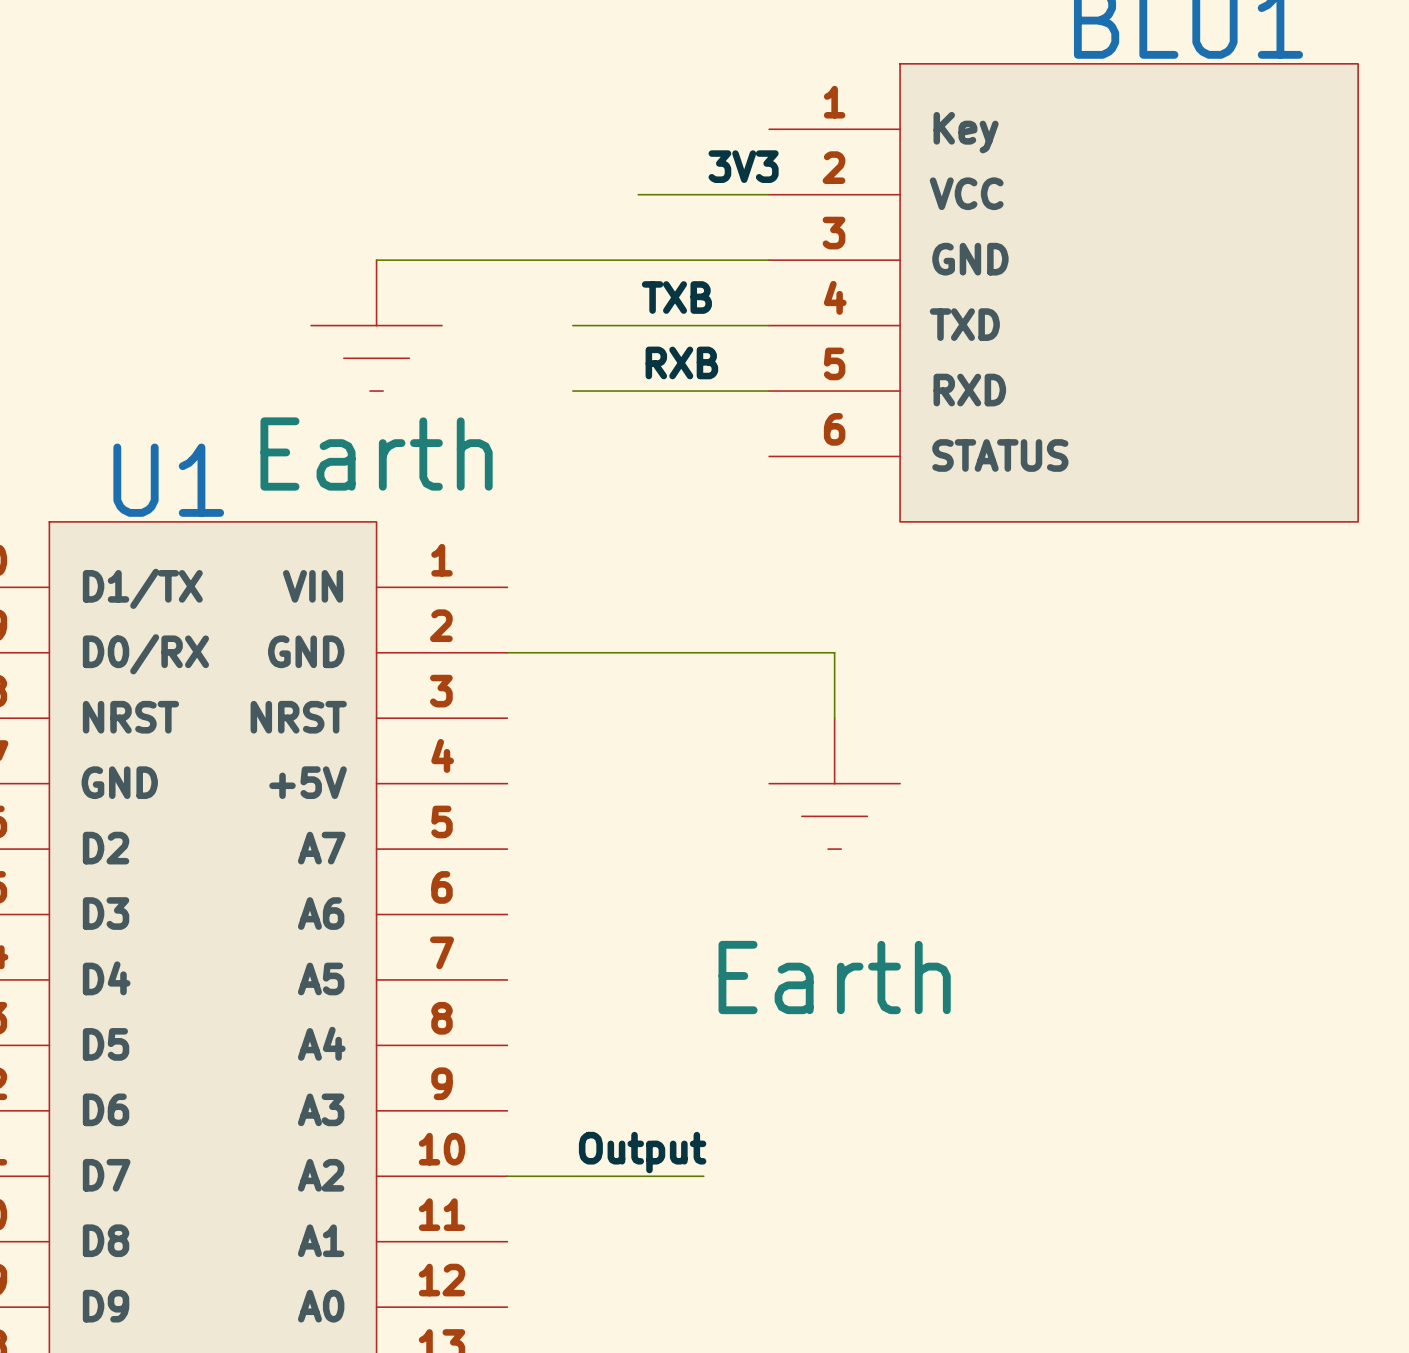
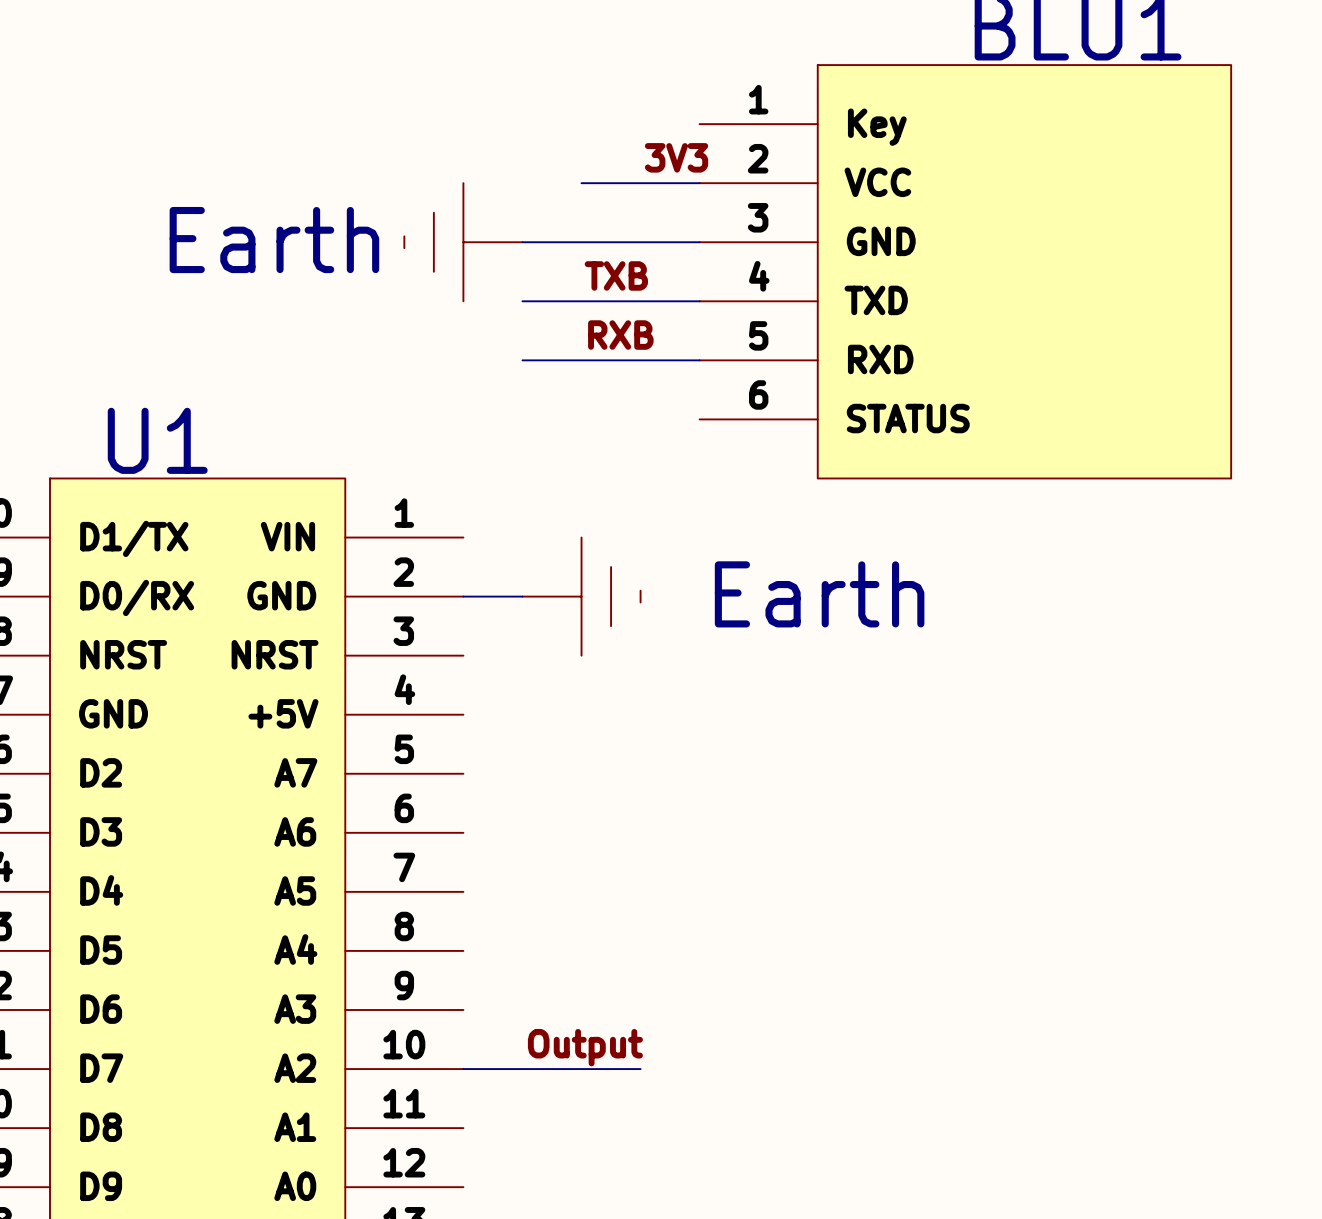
wire: (376, 260) (572, 260) -> none
power symbol rotation: 0° (376, 325) -> 90° clockwise (463, 242)
power symbol position: Earth (376, 325) -> Earth (463, 242)
wire: (572, 652) (834, 652) (834, 718) -> none
power symbol: none -> Earth (581, 596)
power symbol: Earth (834, 783) -> none

